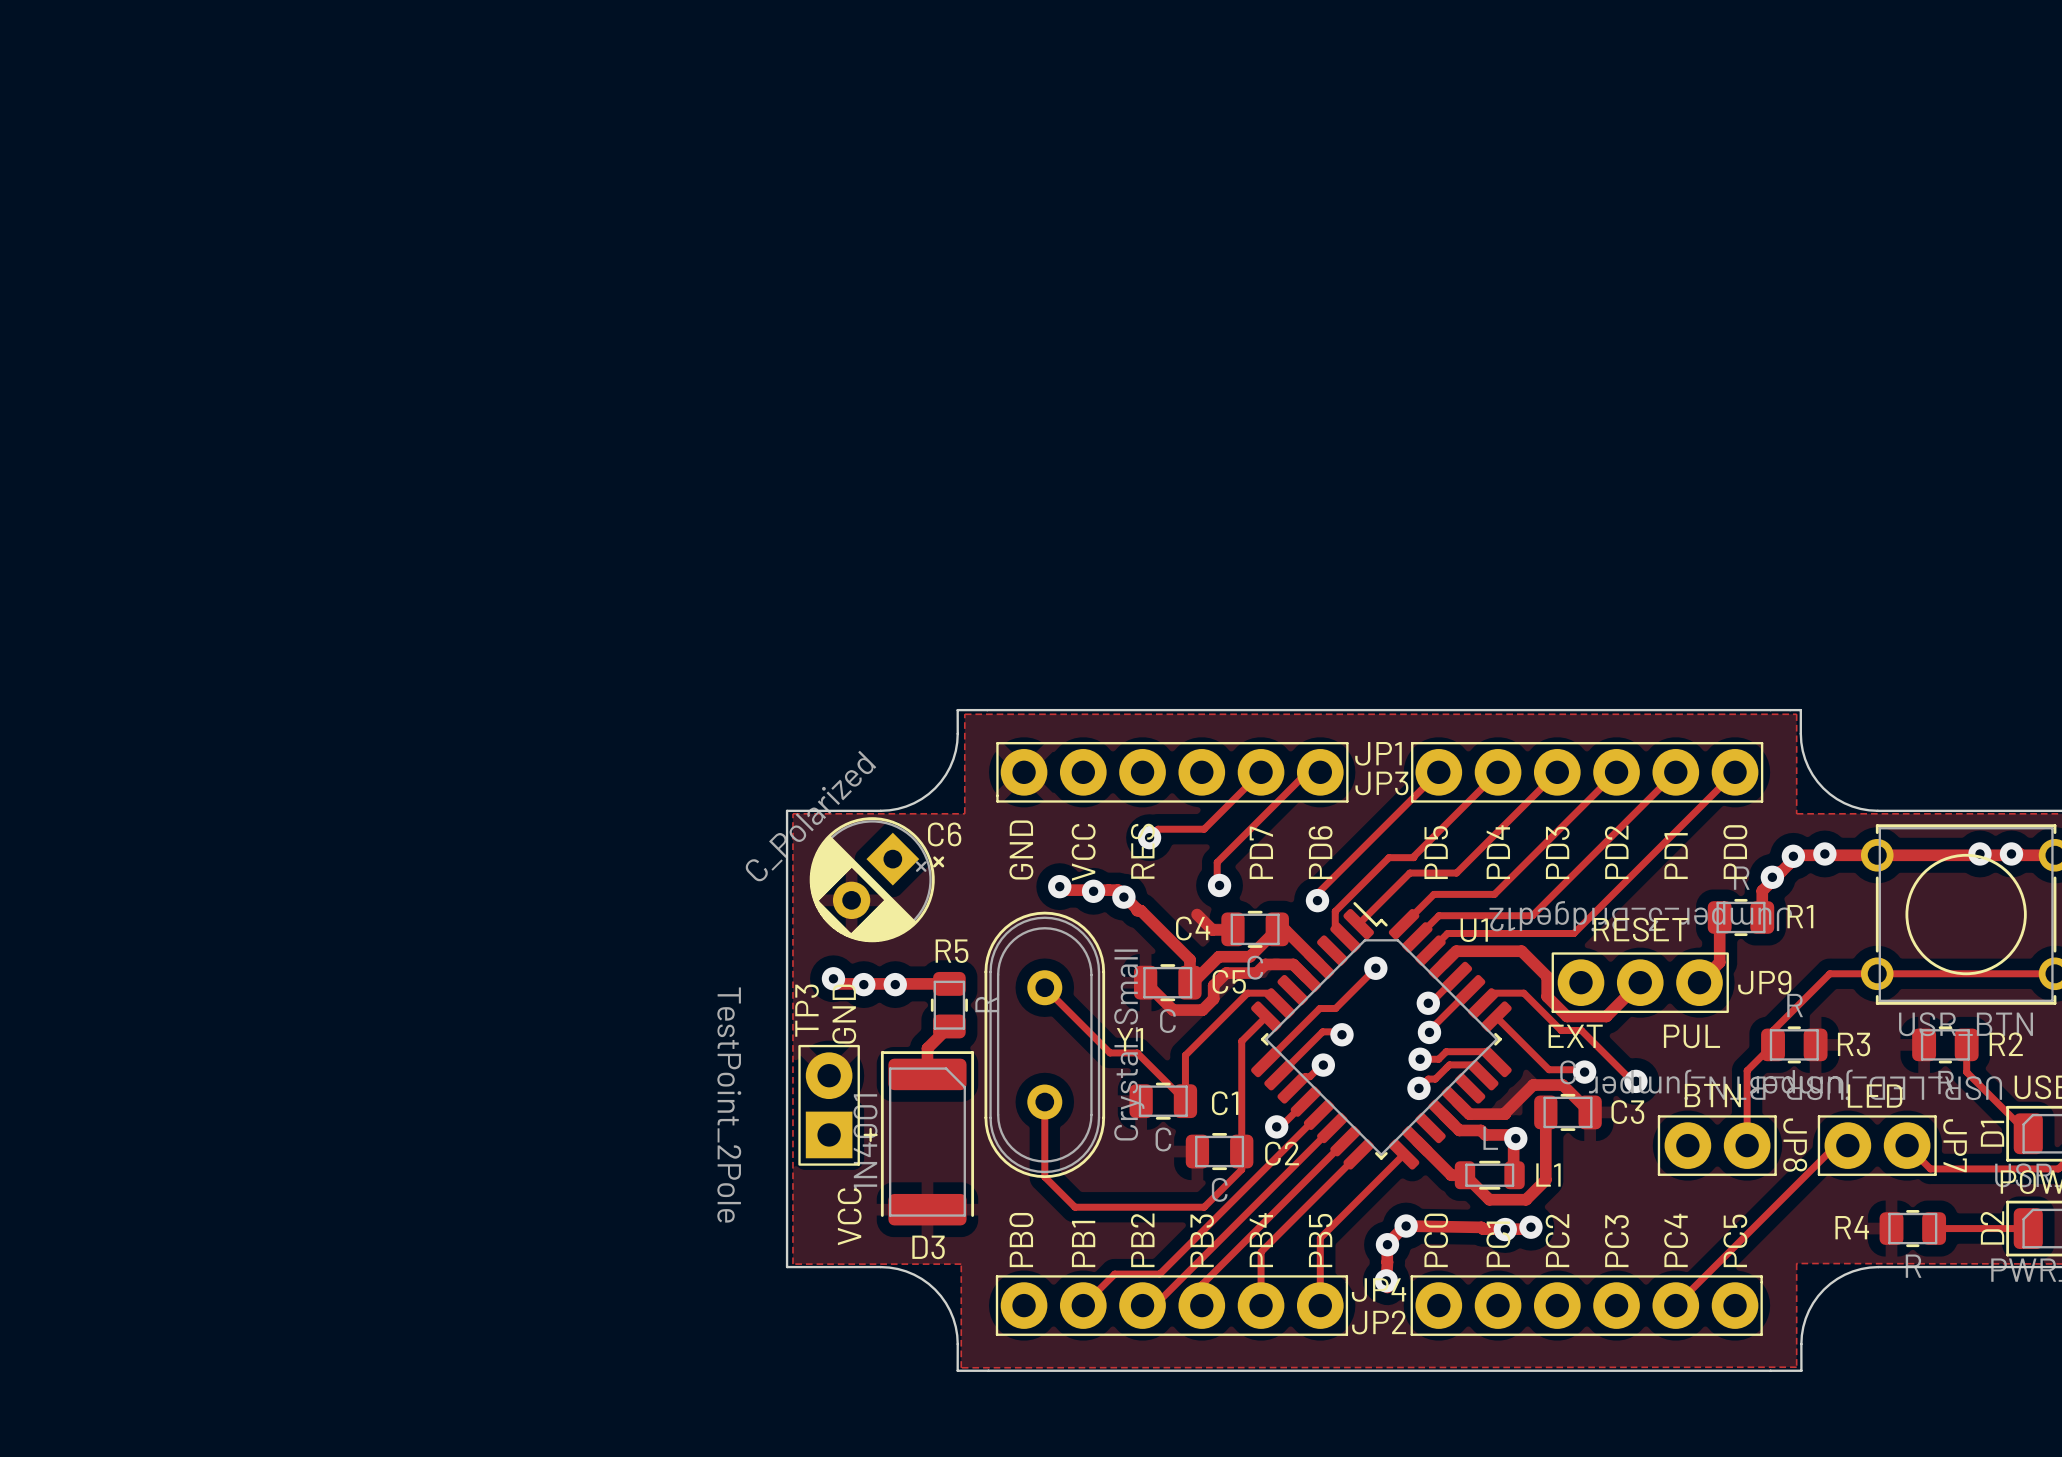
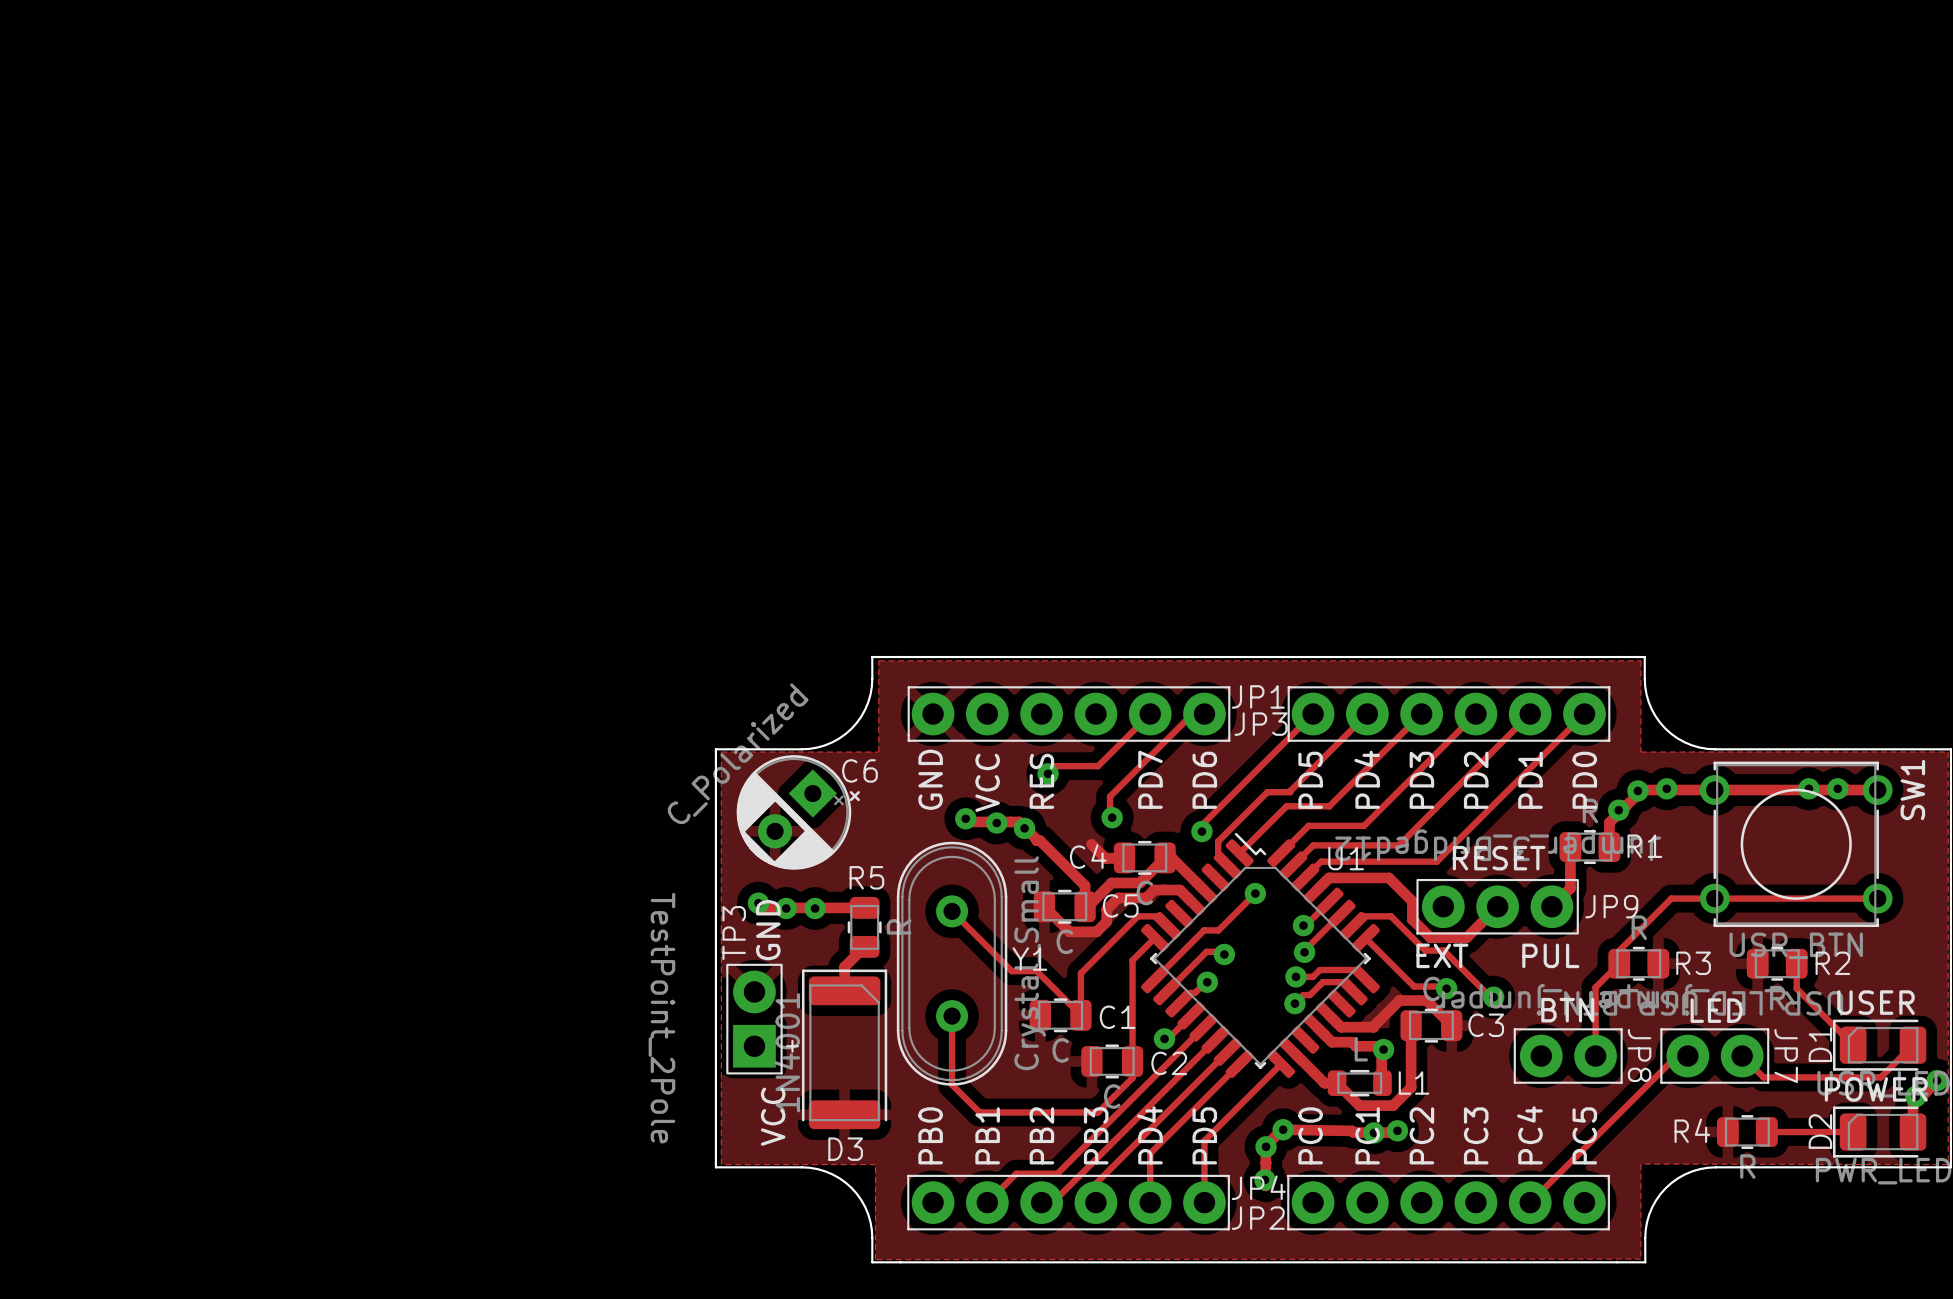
text: PB4 (1261, 1240) -> PD4 (1149, 1135)
text: PB5 (1320, 1240) -> PD5 (1204, 1135)

